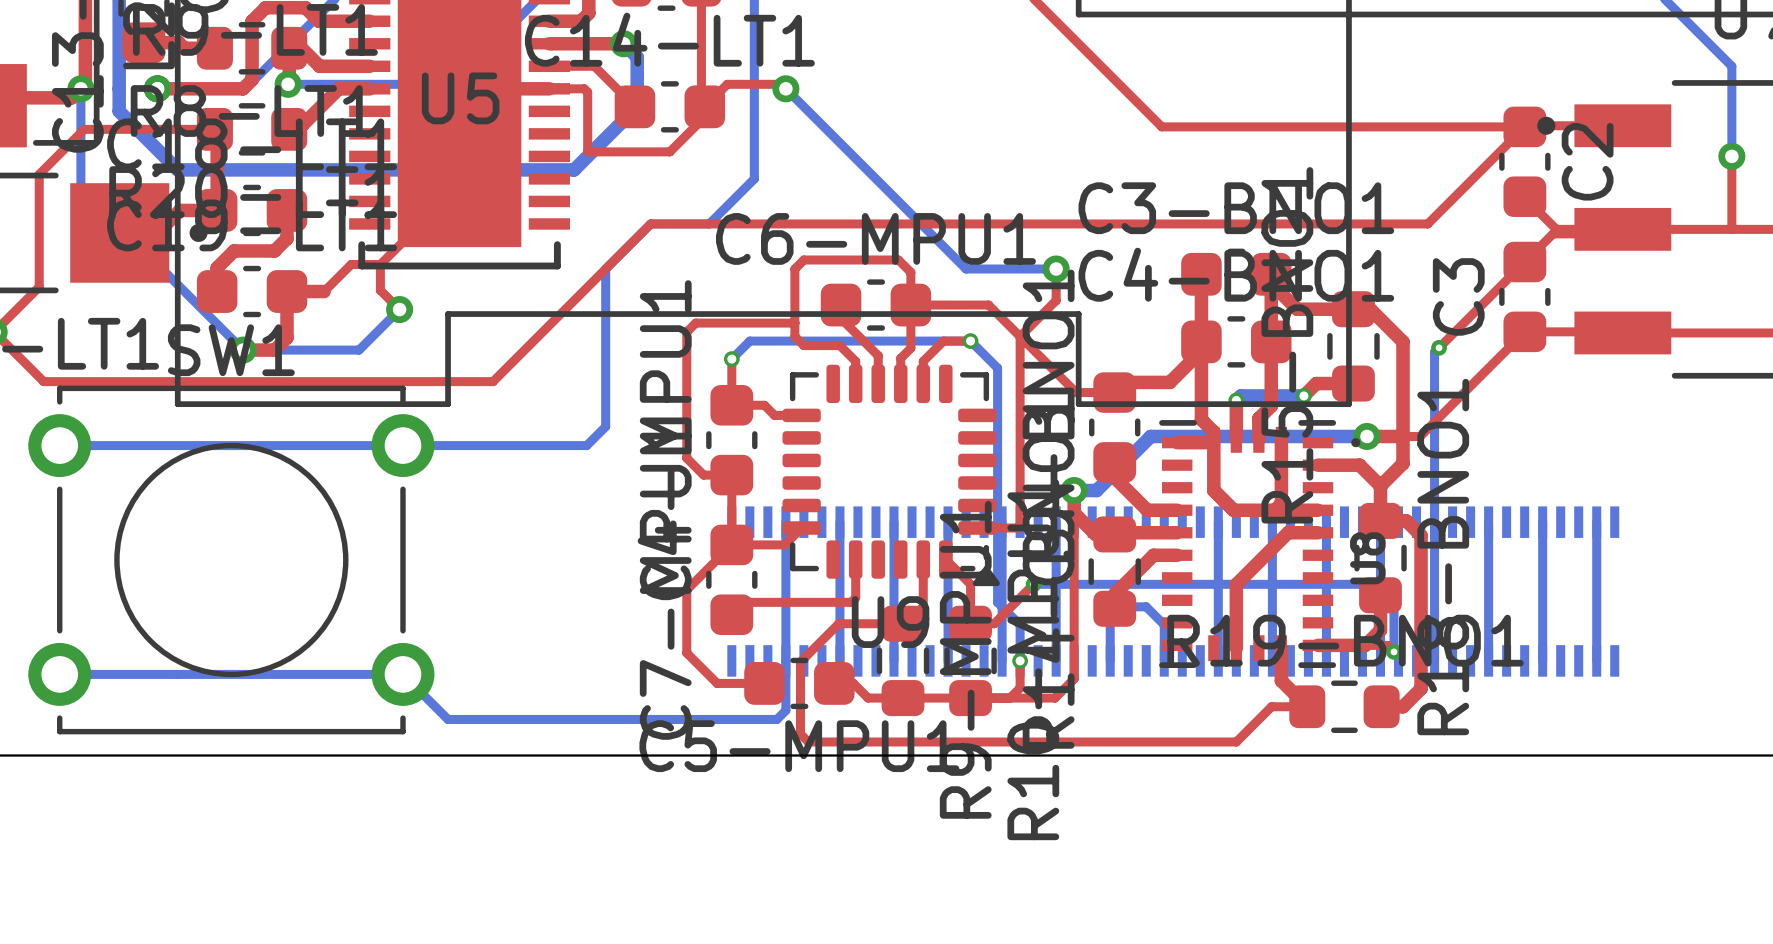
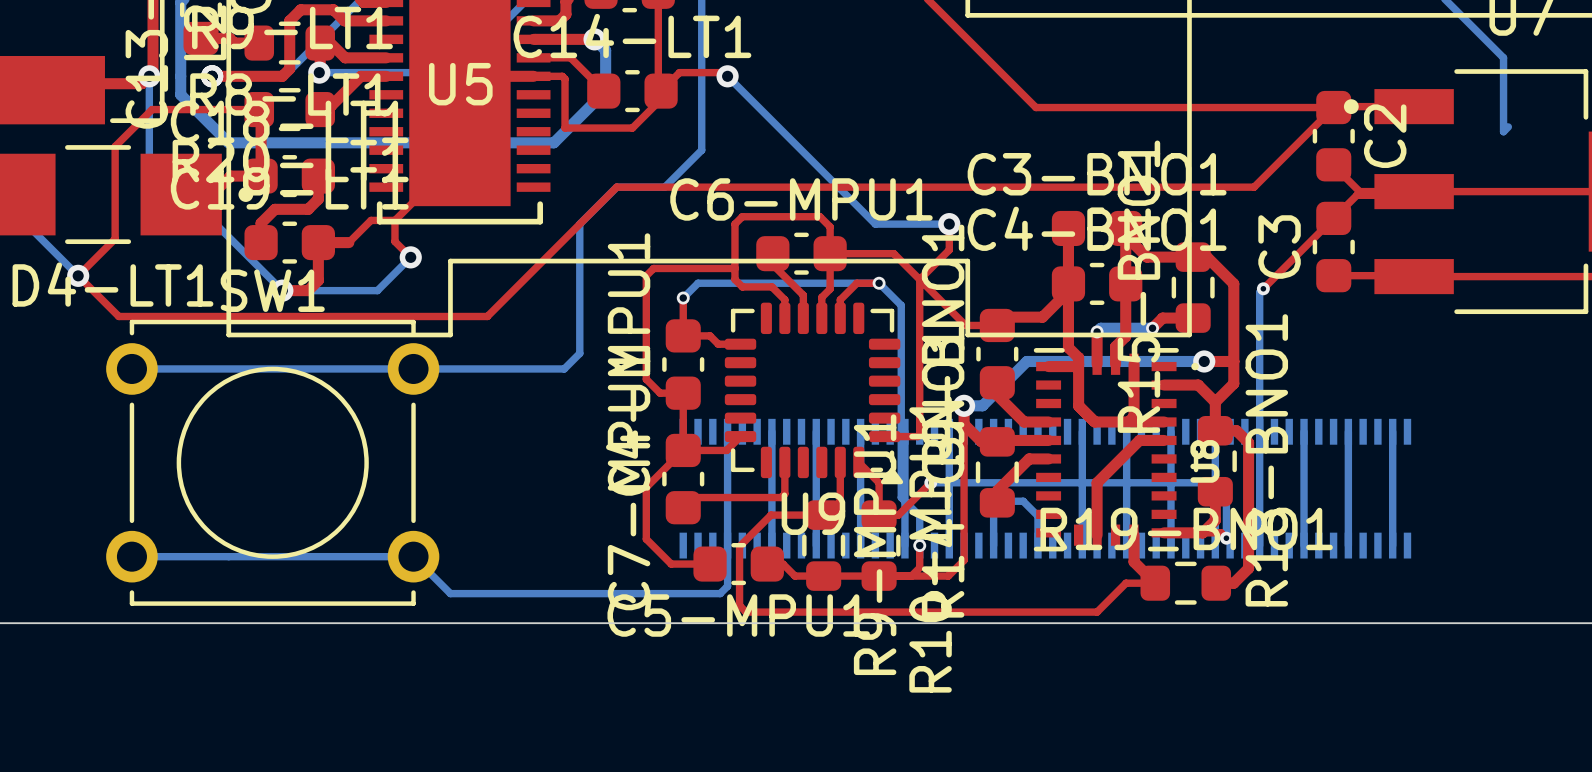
top track: (1731, 156) (1731, 229) -> none
via: (1731, 156) -> none
top track: (1524, 331) (1420, 436) (1403, 436) -> none

